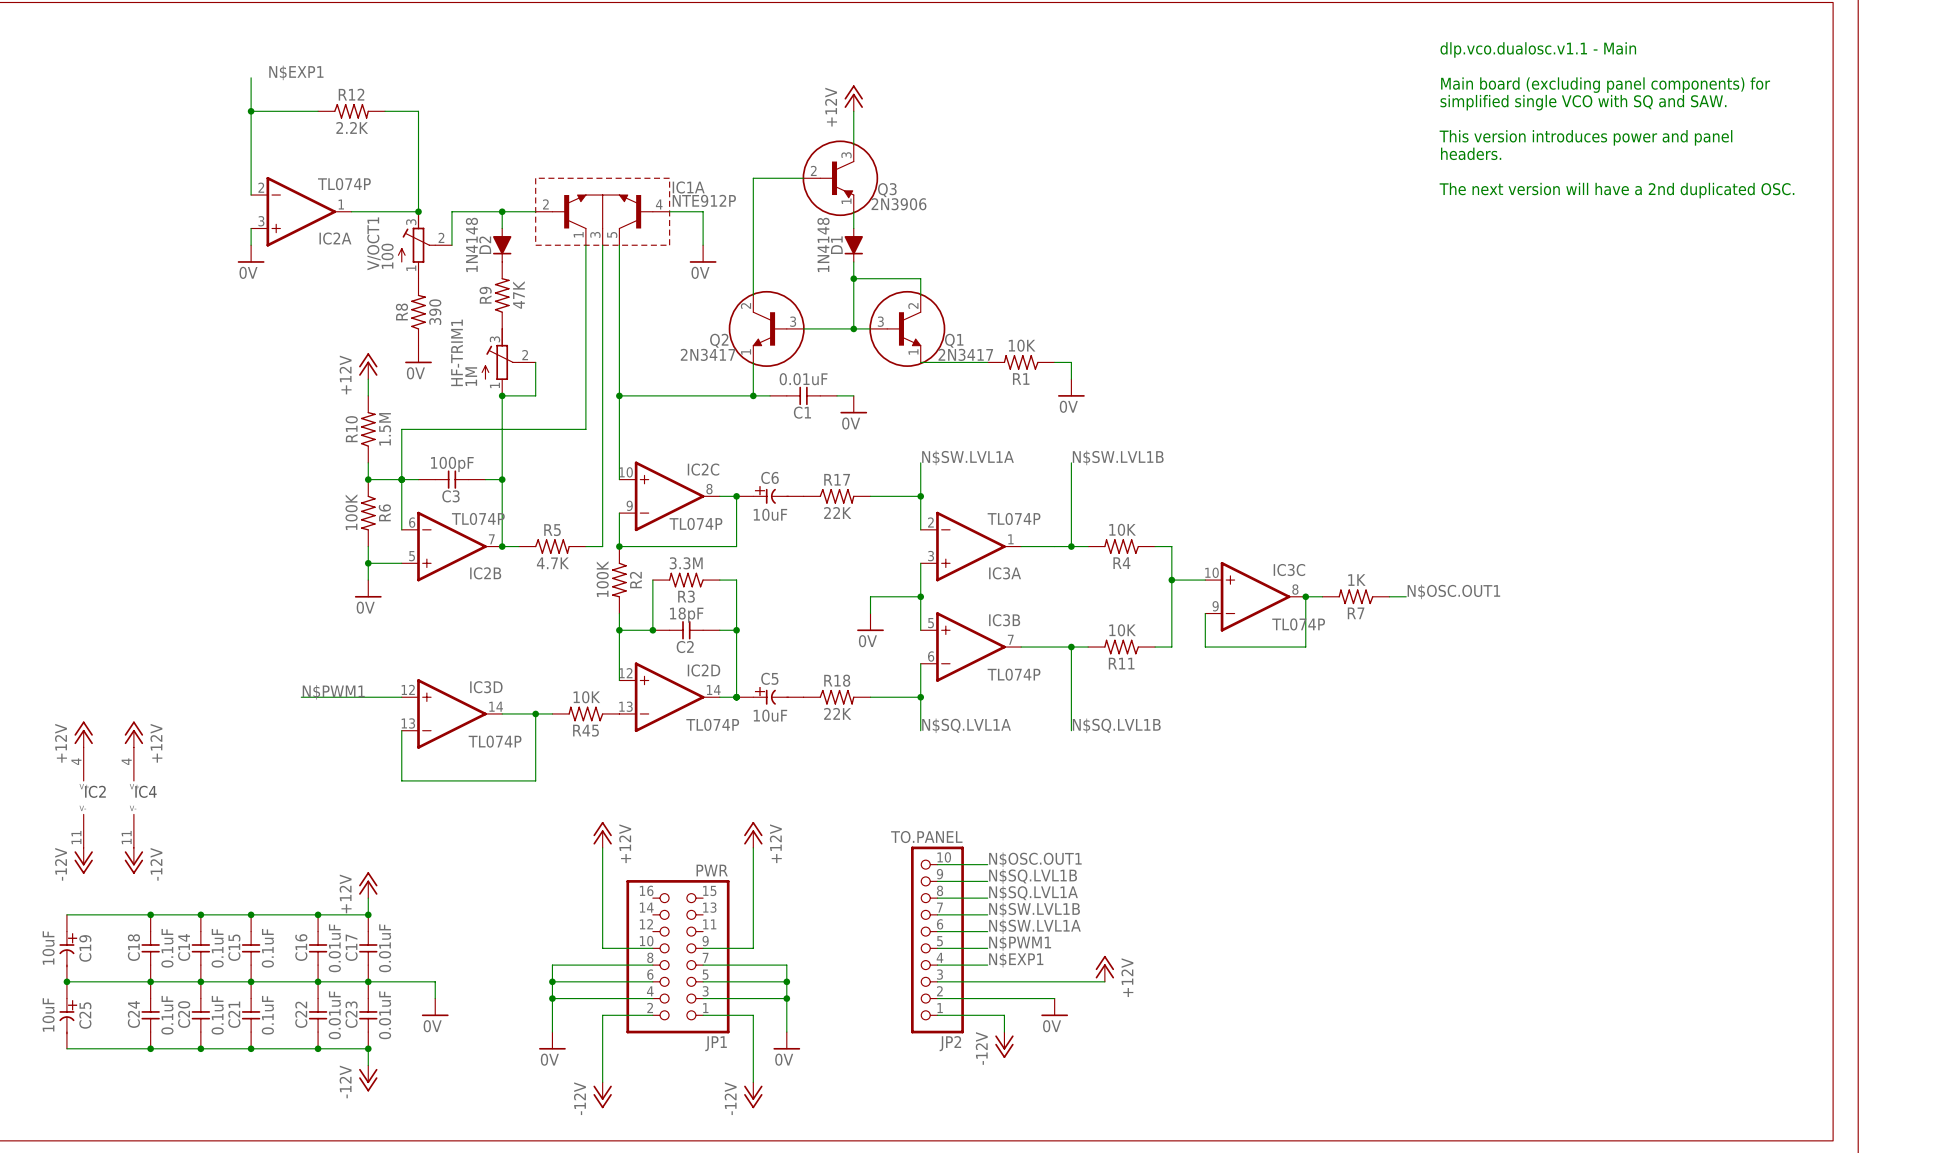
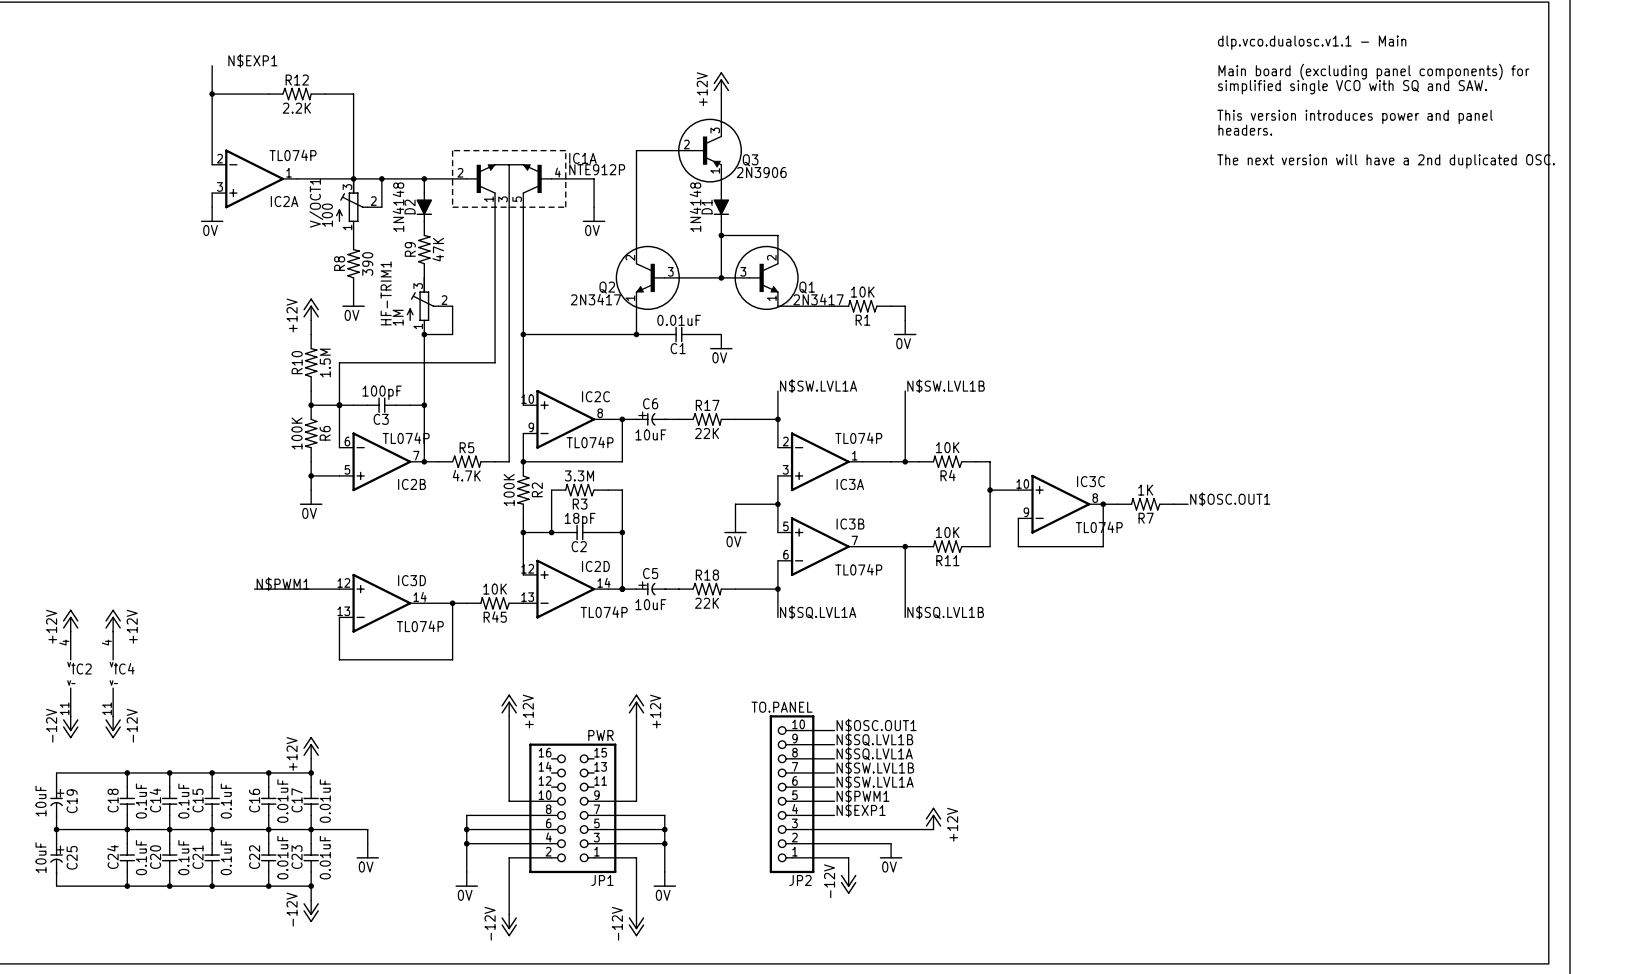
wire: none -> (353, 178) (381, 178)
junction: none -> (381, 178)

